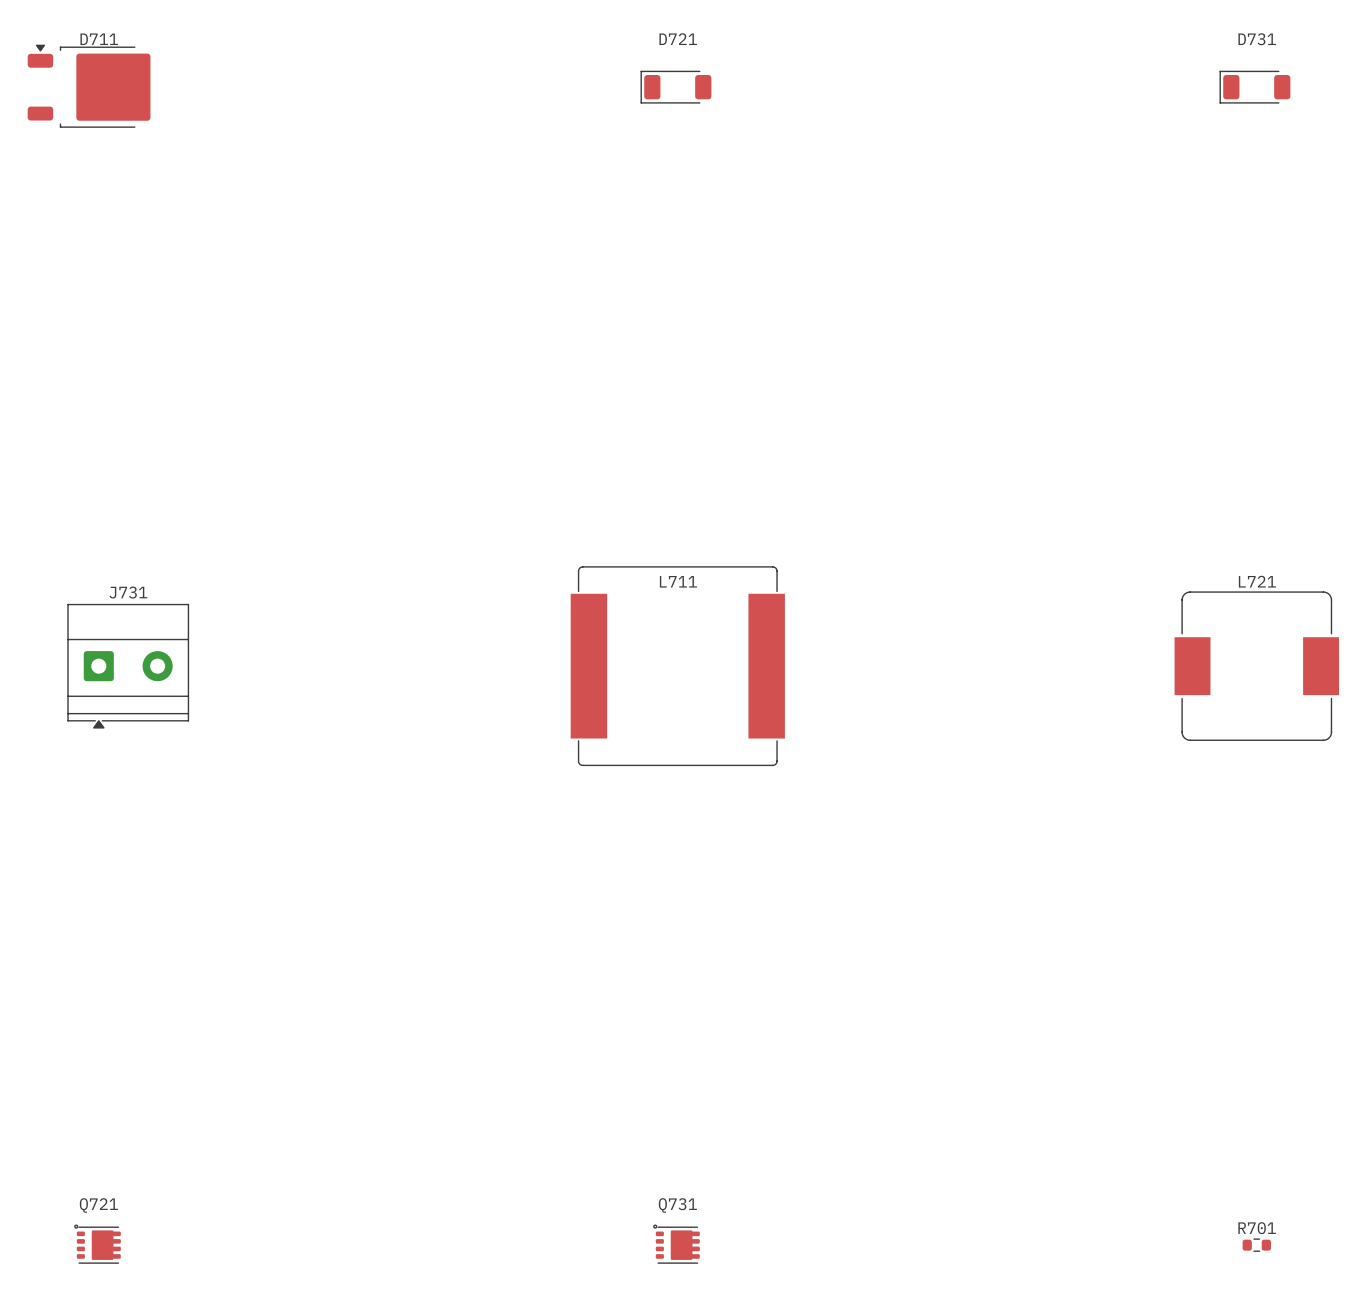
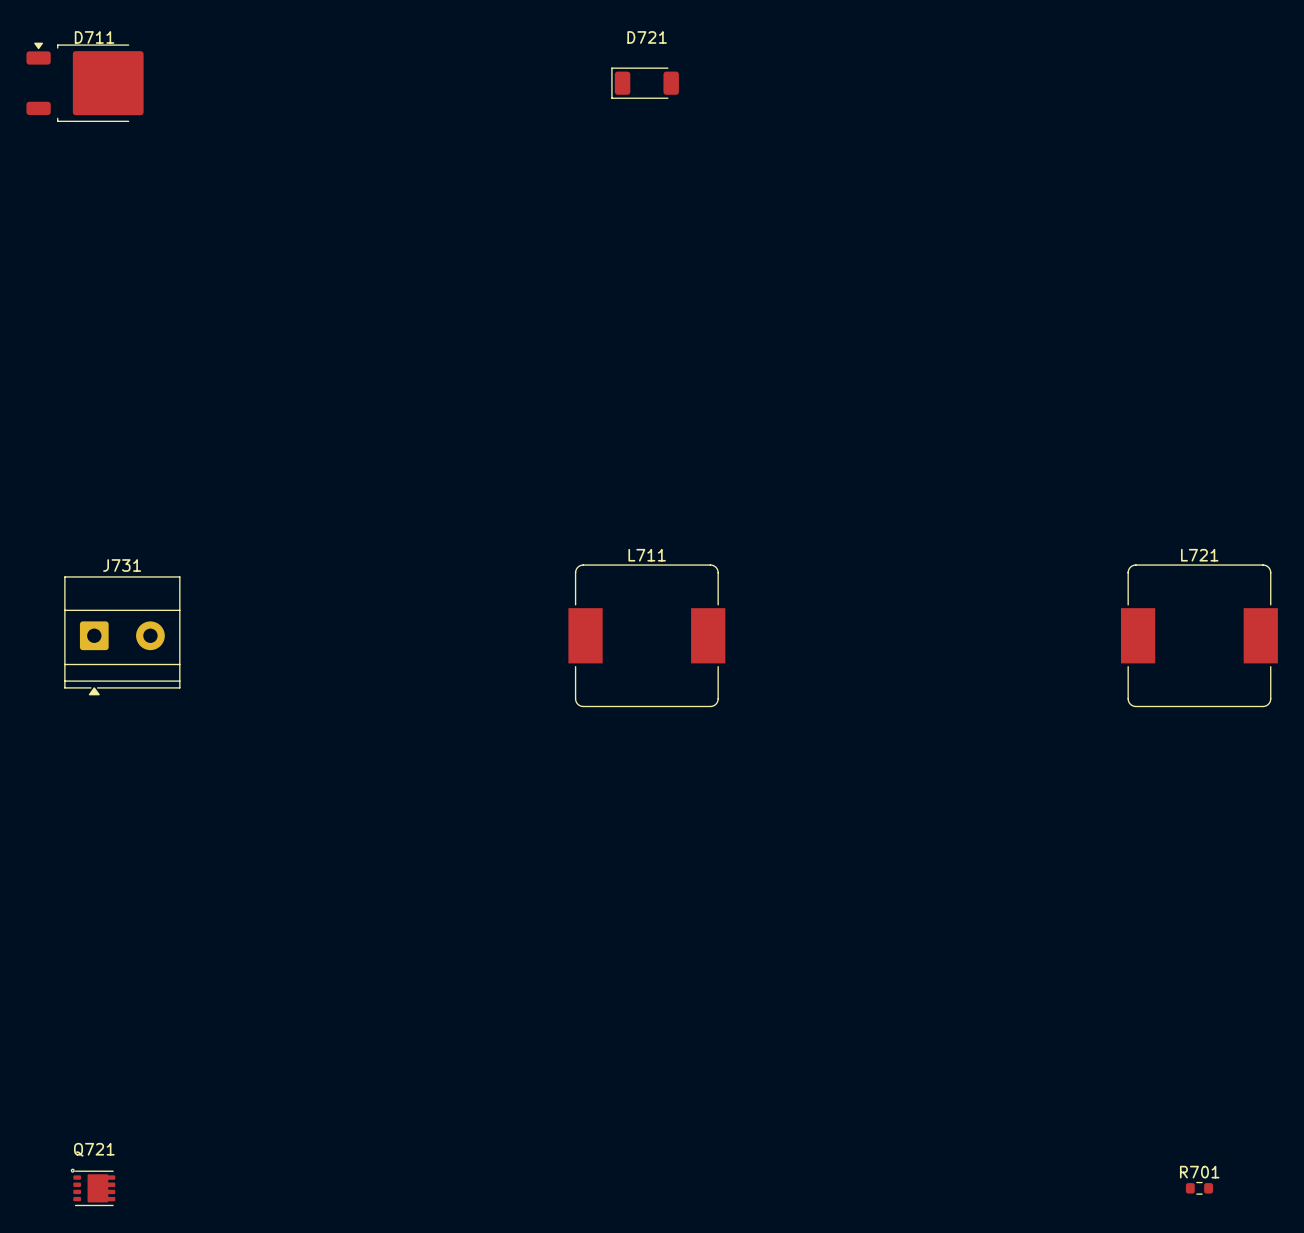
D731: (1254, 87) -> none
L711 footprint: [570, 566, 785, 767] -> [568, 564, 726, 708]
Q731: (676, 1244) -> none

